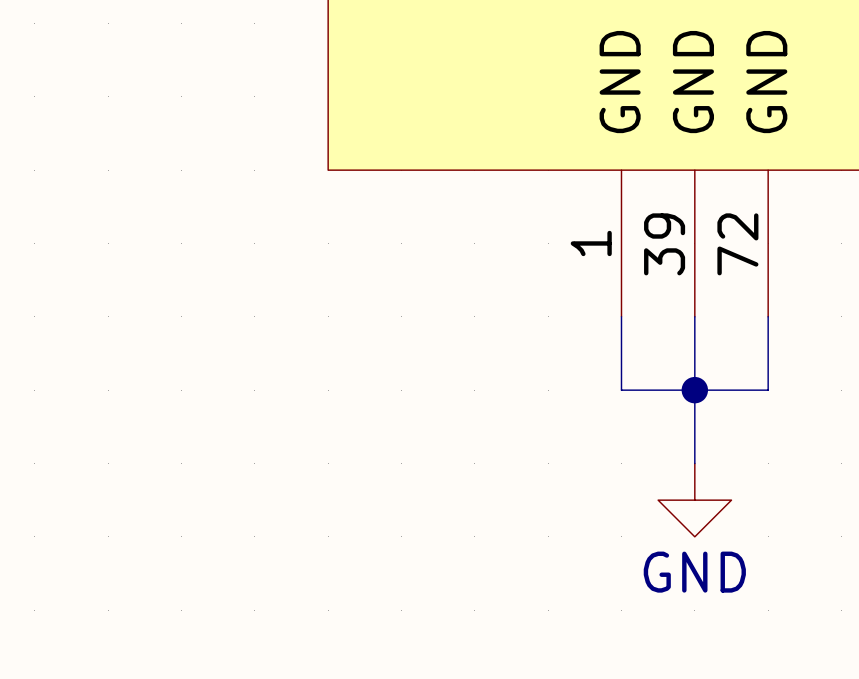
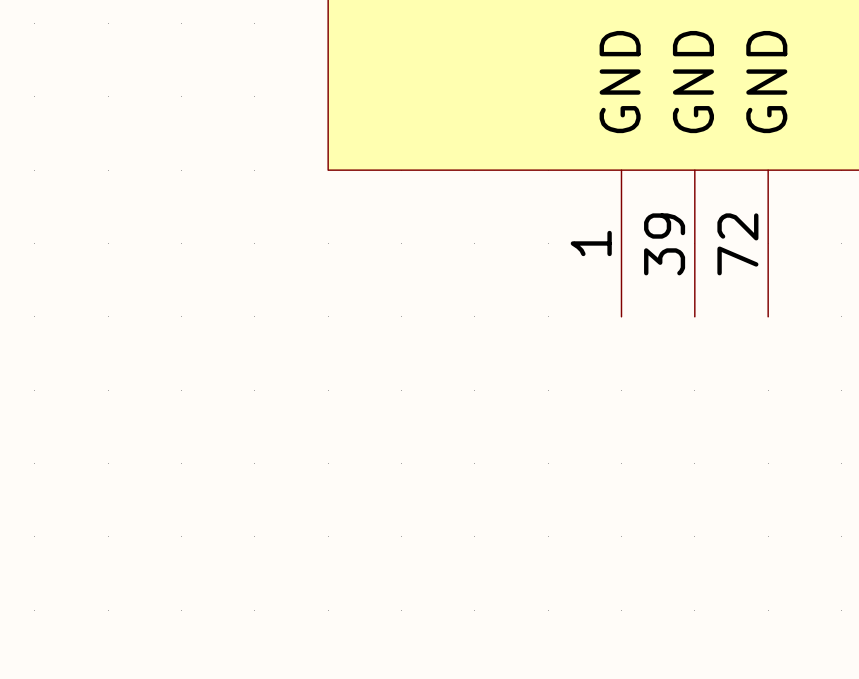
wire: (621, 316) (621, 390) (768, 390) (768, 316) -> none
wire: (694, 316) (694, 463) -> none
junction: (694, 390) -> none
power symbol: GND (694, 500) -> none

